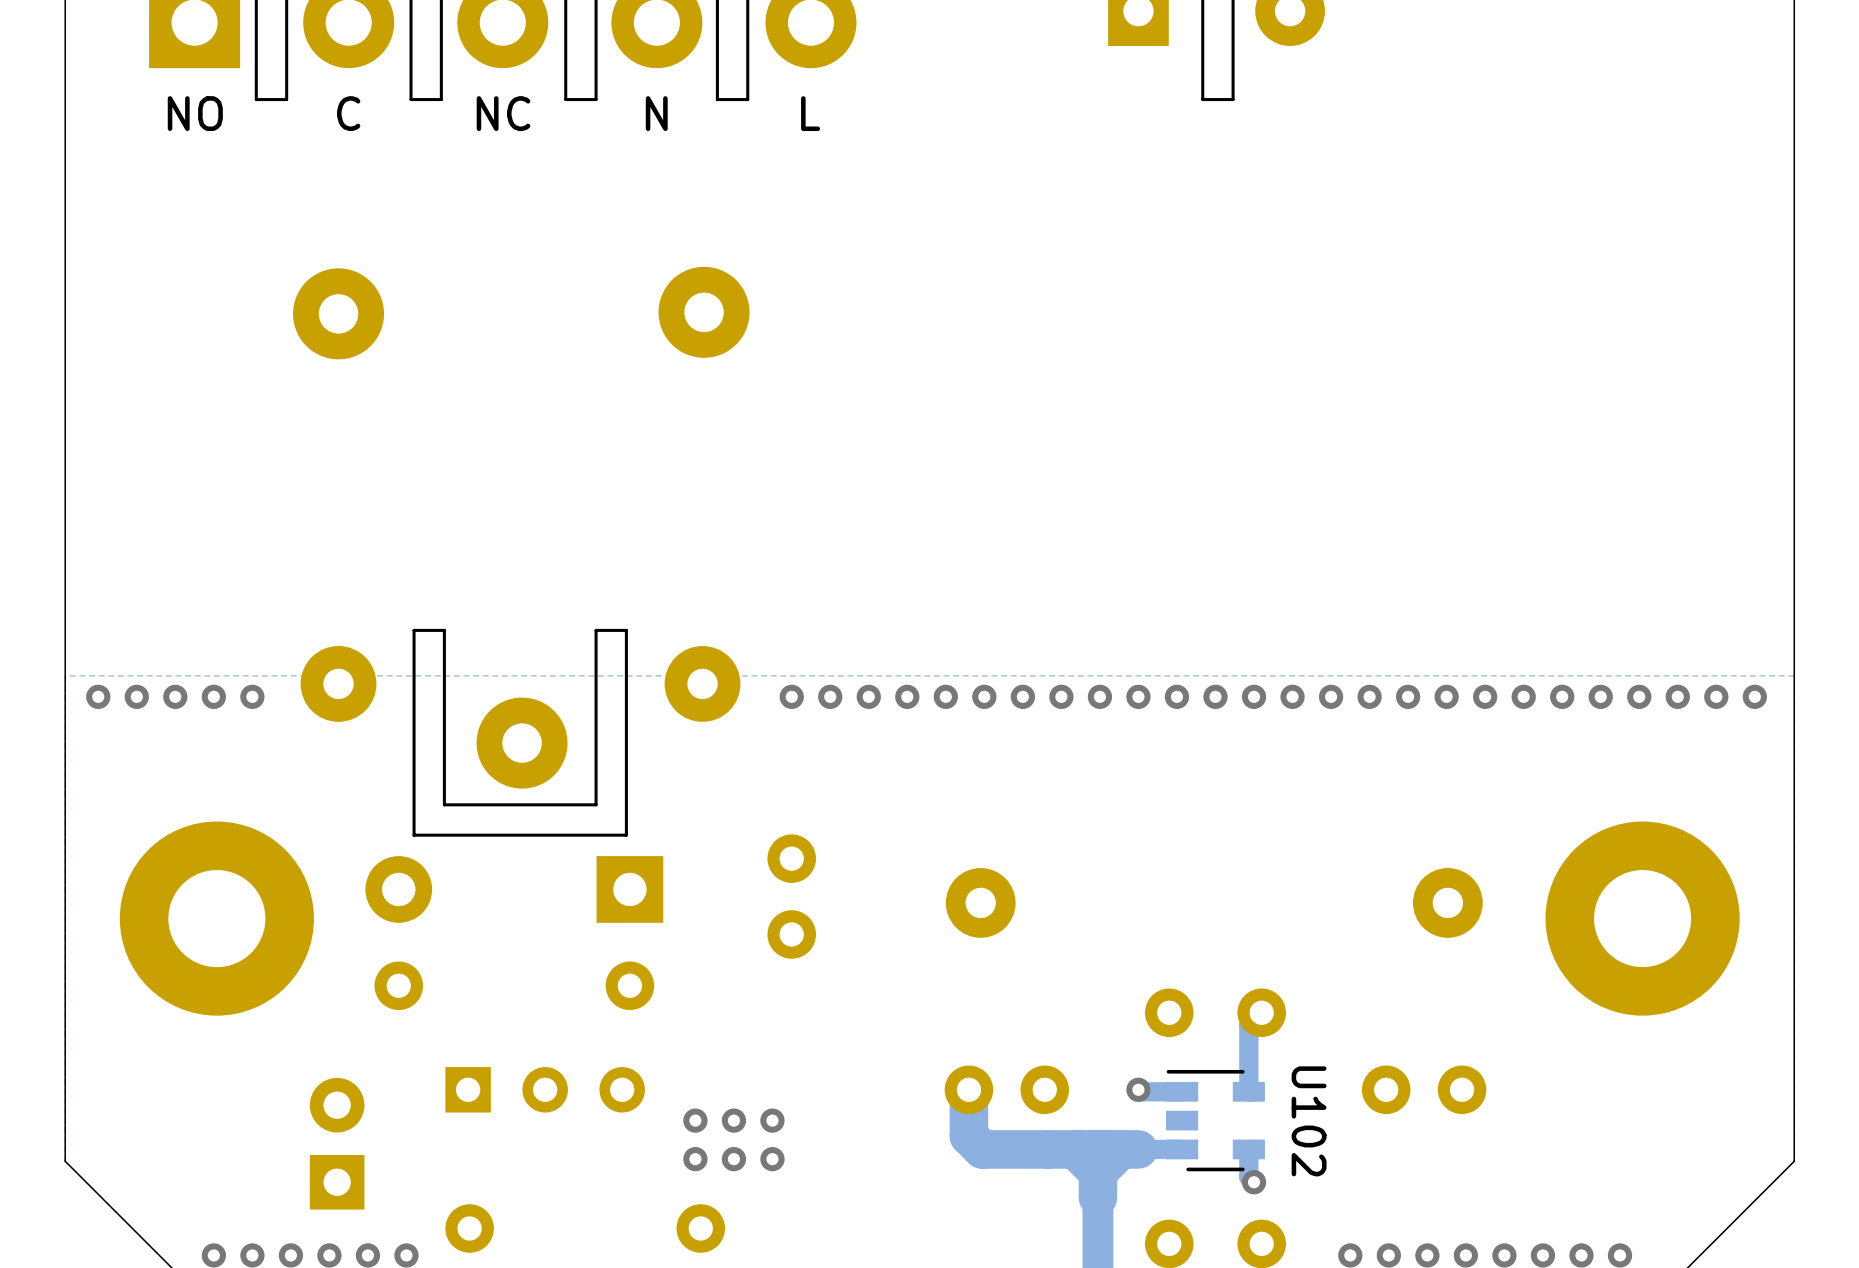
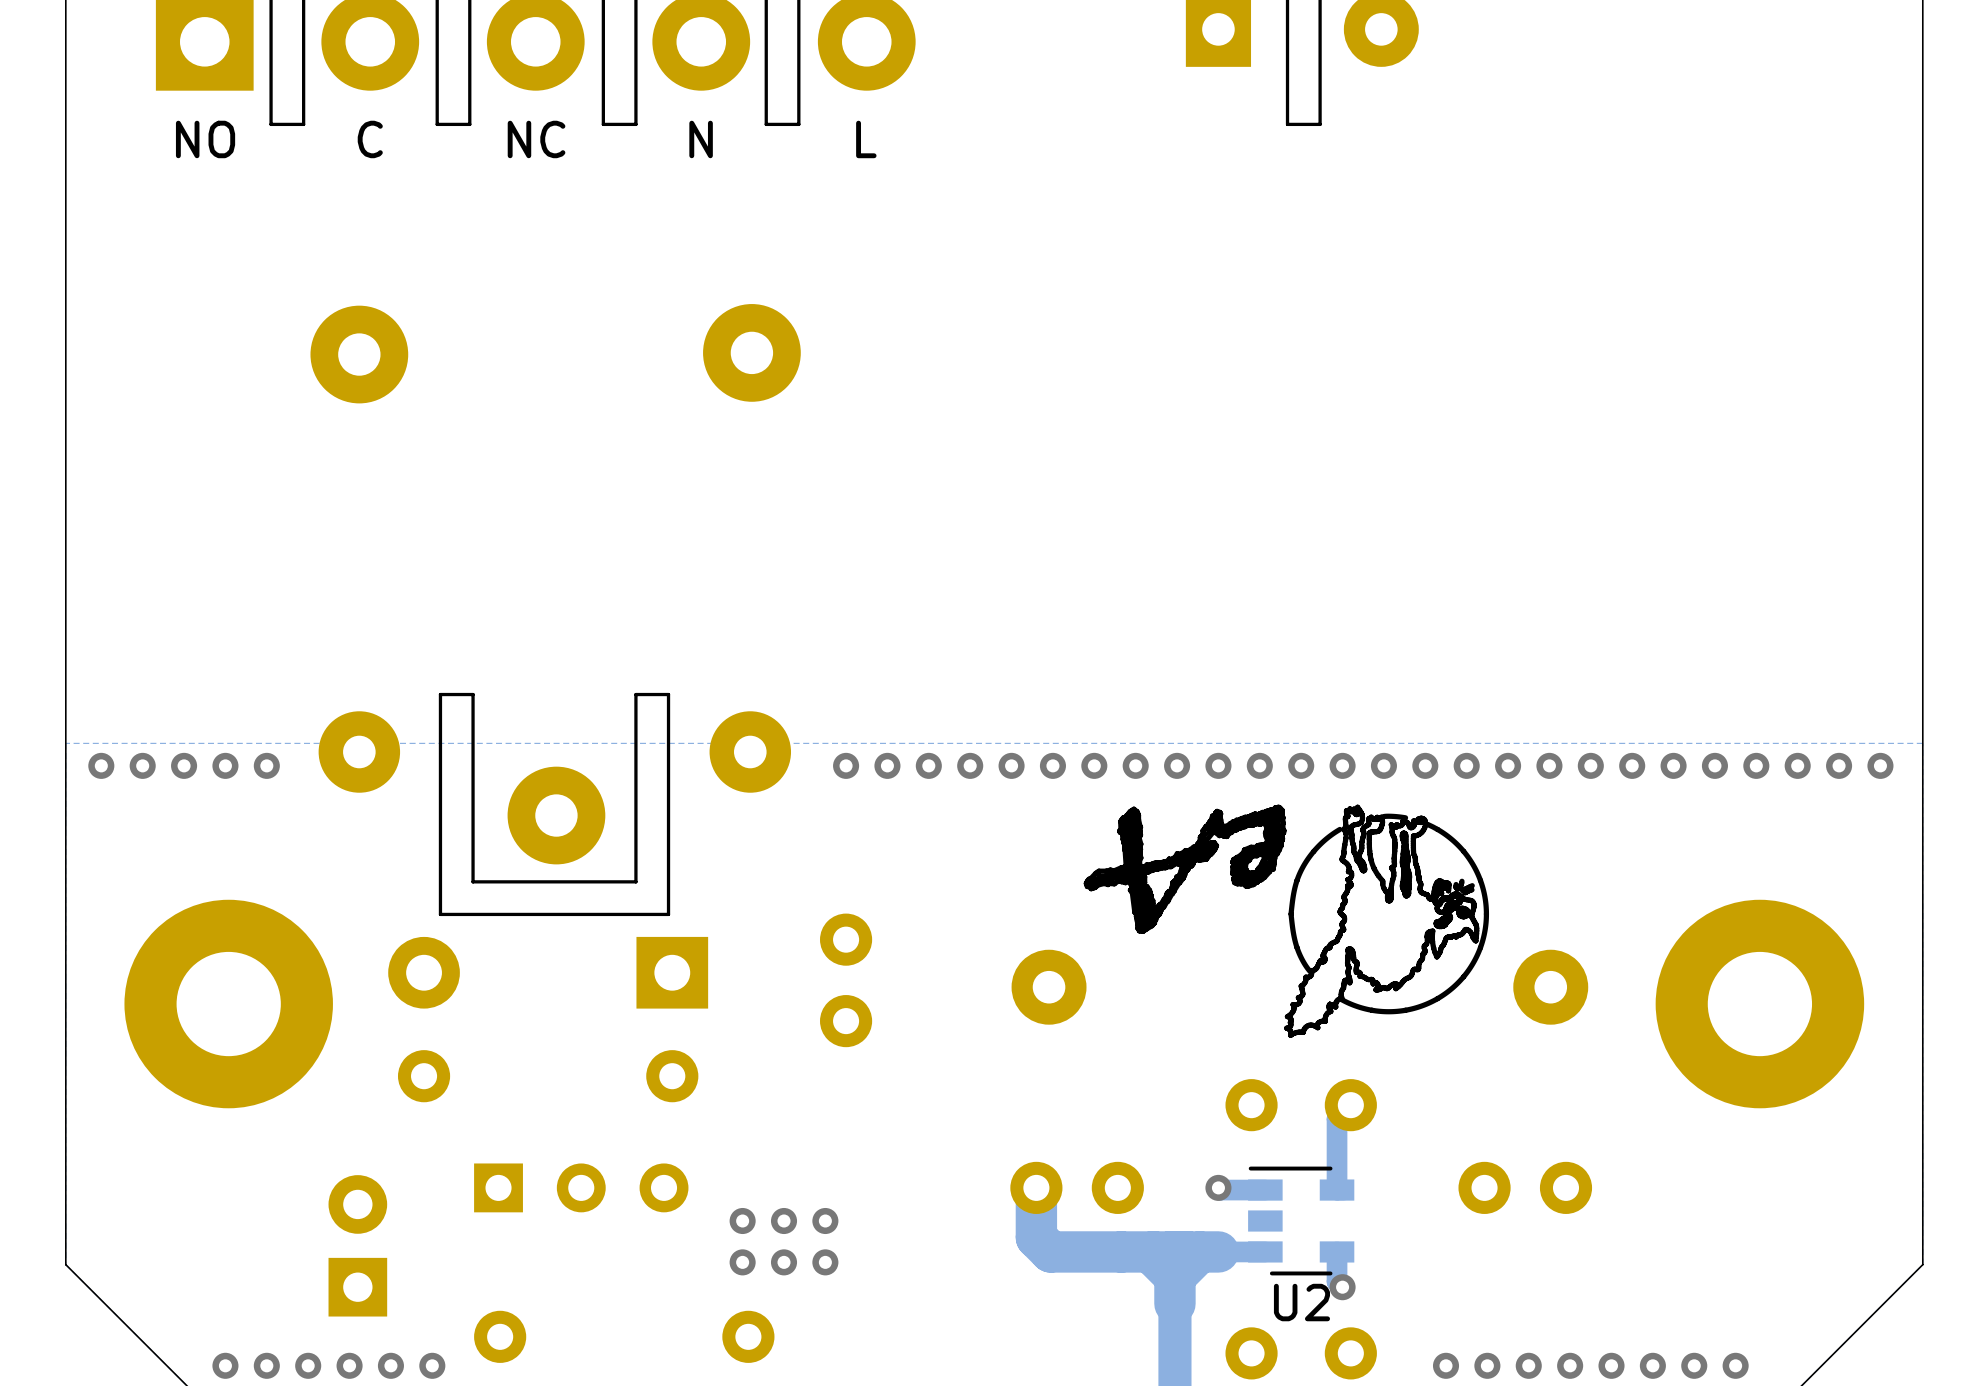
drawing: none -> [1083, 804, 1490, 1038]
U102 name: U102 (1309, 1121) -> U2 (1301, 1302)

